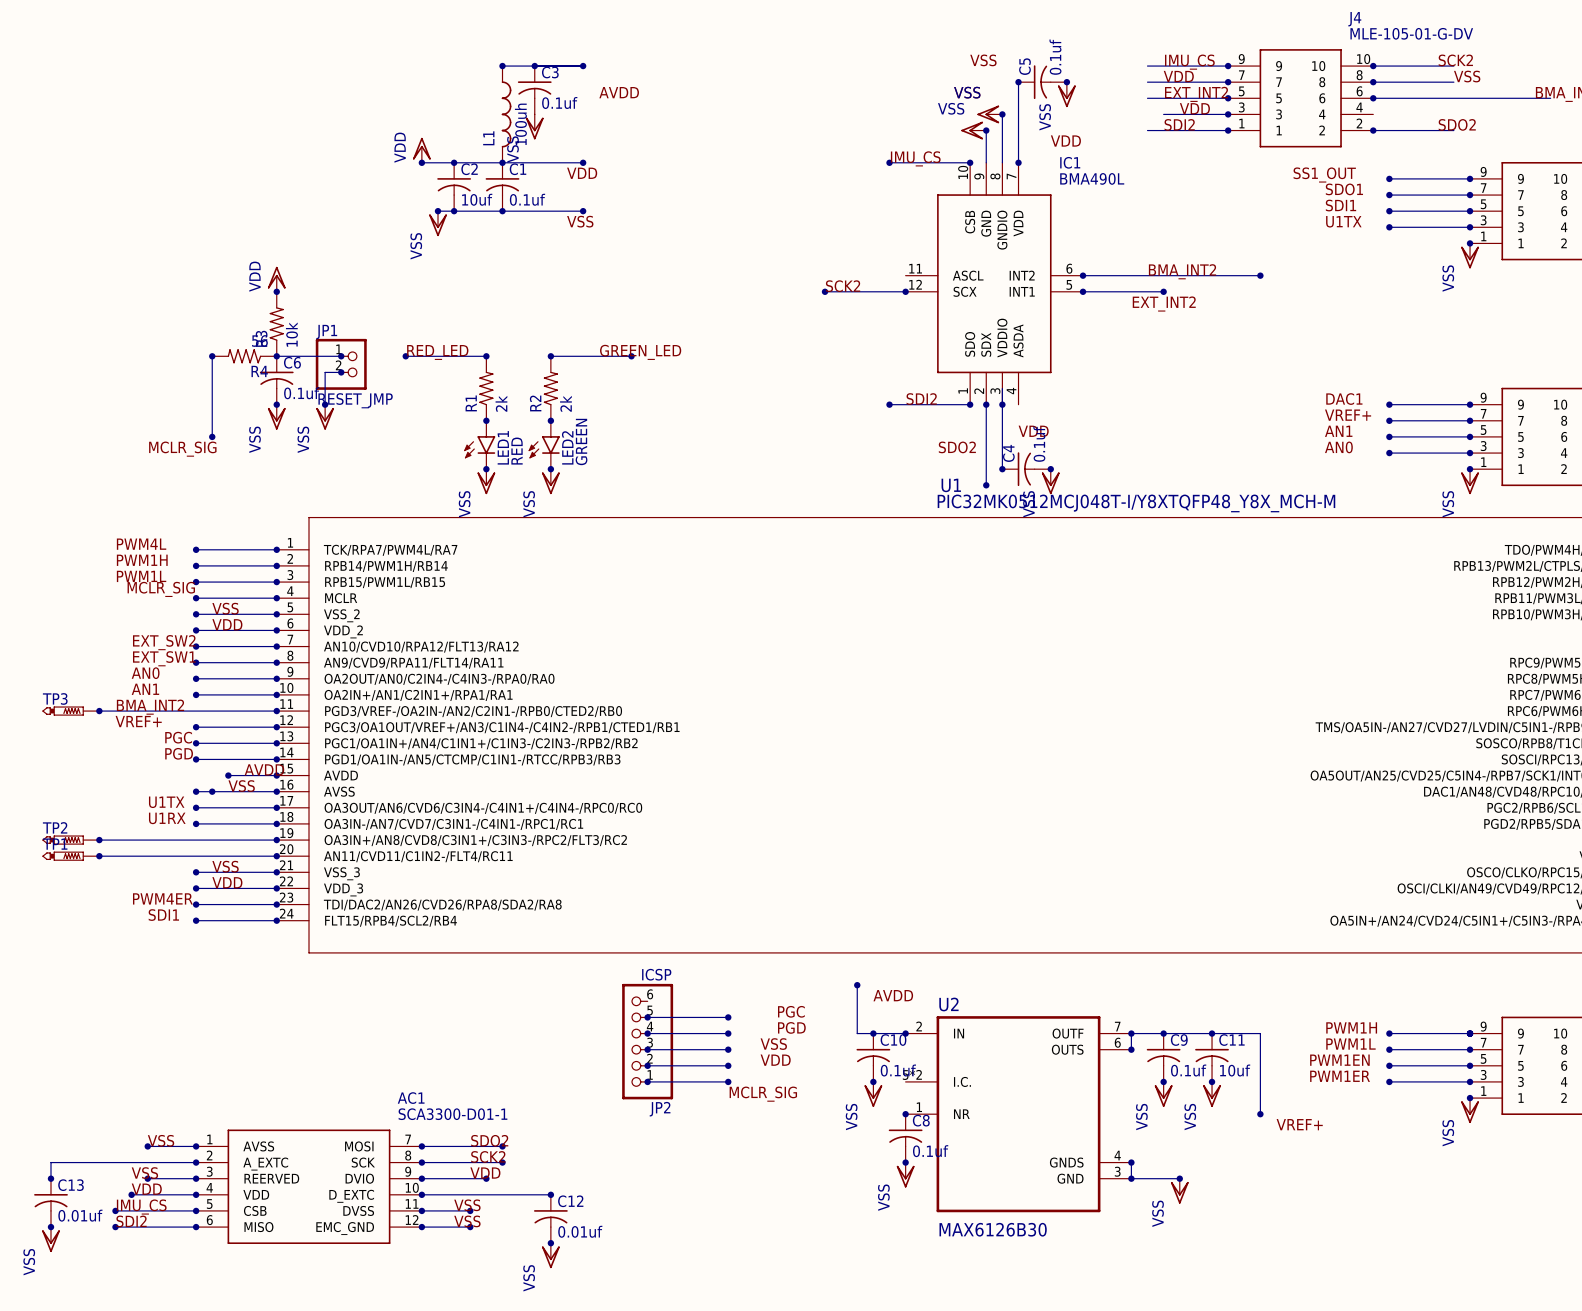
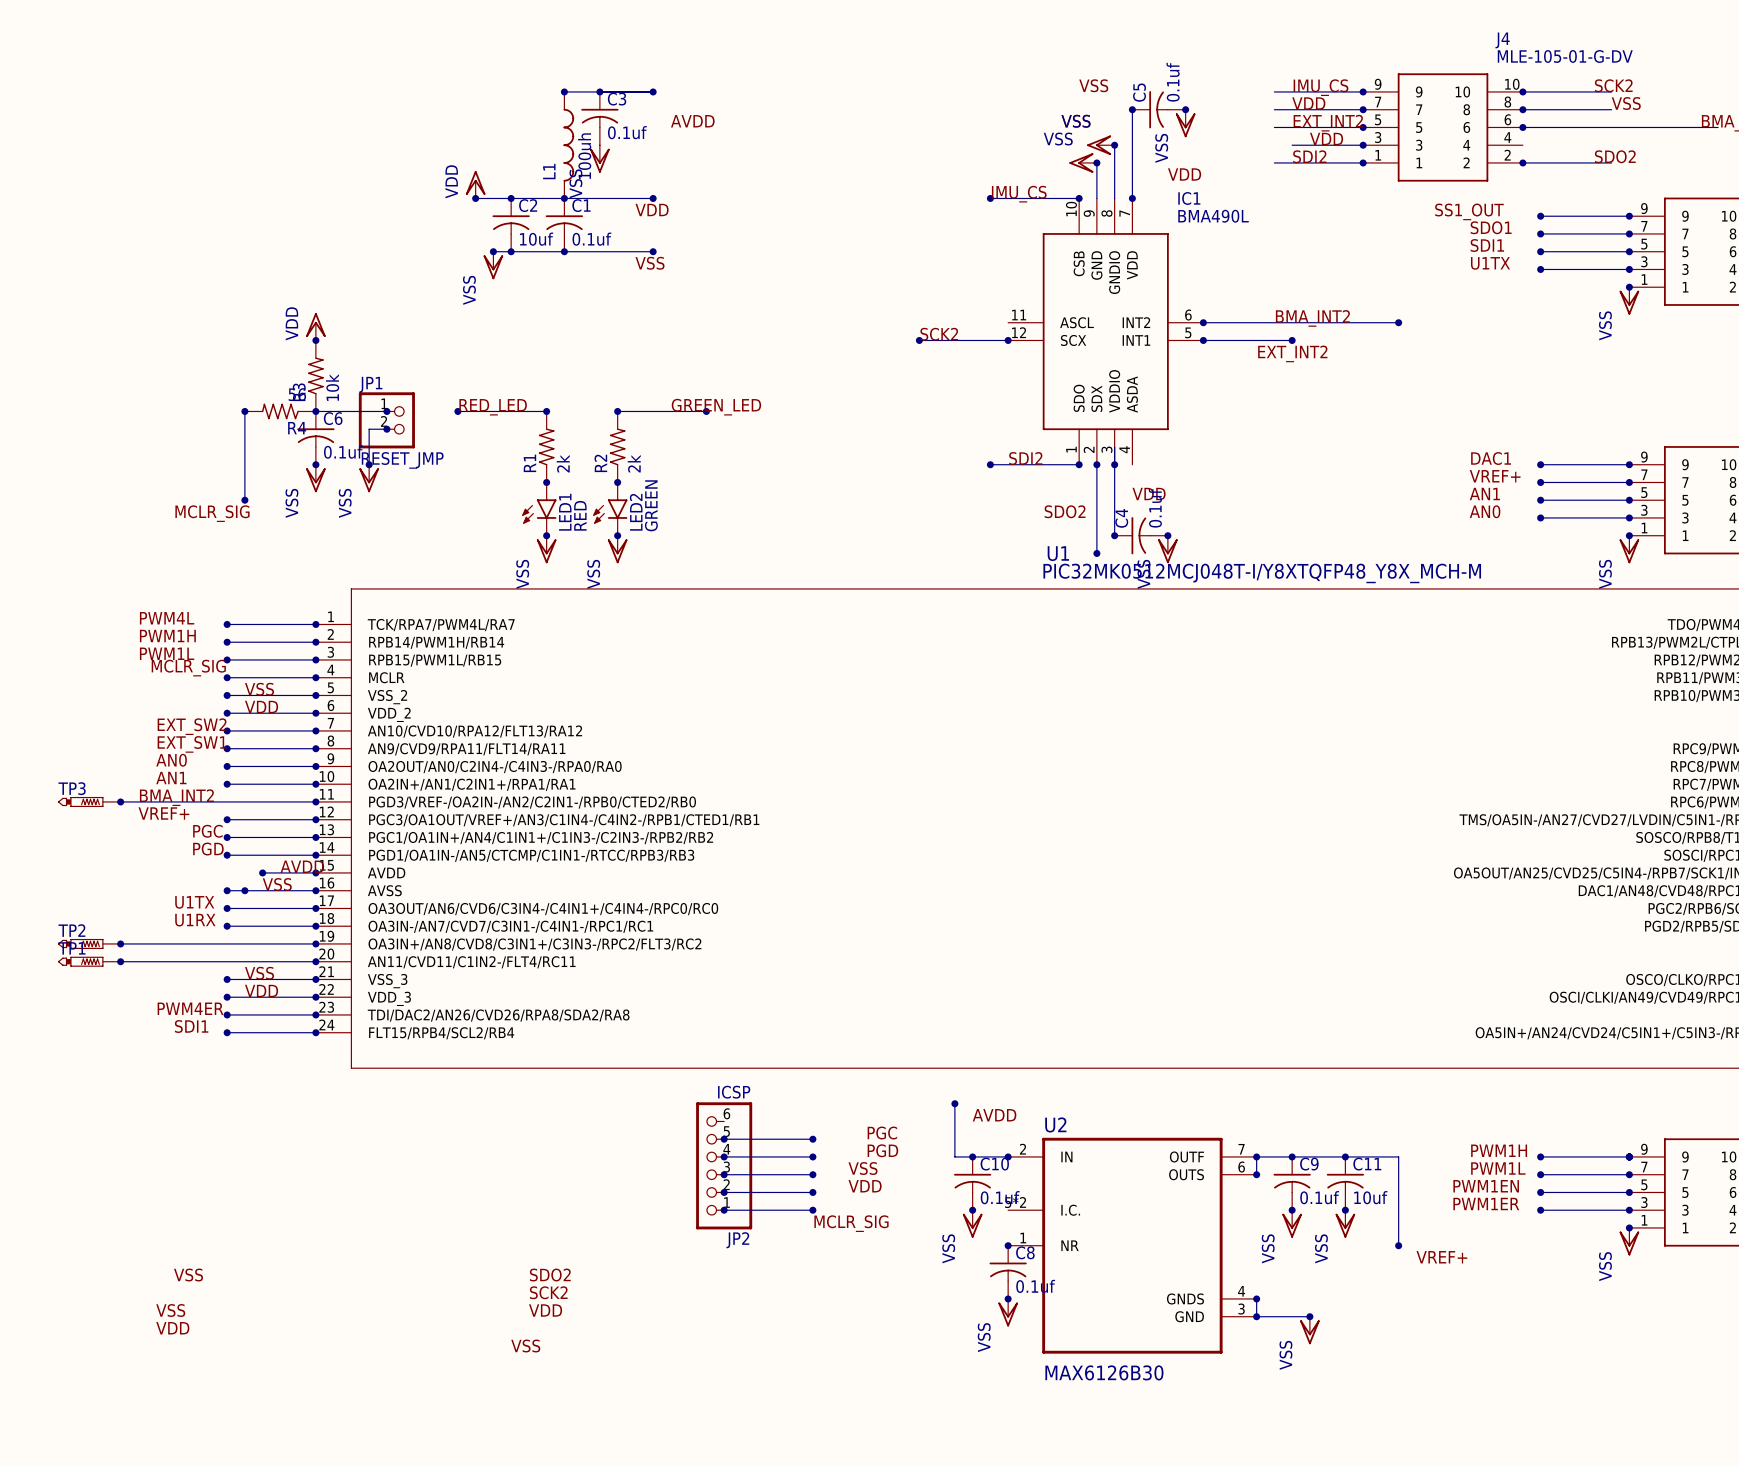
wire: (147, 1146) (196, 1146) -> none
junction: (147, 1146) -> none
junction: (196, 1146) -> none
wire: (421, 1146) (502, 1146) -> none
junction: (421, 1146) -> none
junction: (502, 1146) -> none
wire: (196, 1162) (50, 1162) (50, 1178) -> none
junction: (196, 1162) -> none
wire: (421, 1162) (502, 1162) -> none
junction: (421, 1162) -> none
junction: (502, 1162) -> none
junction: (50, 1178) -> none
wire: (147, 1178) (196, 1178) -> none
junction: (147, 1178) -> none
junction: (196, 1178) -> none
wire: (421, 1178) (486, 1178) -> none
junction: (421, 1178) -> none
junction: (486, 1178) -> none
AC1: SCA3300-D01-1 (309, 1186) -> none
wire: (131, 1194) (196, 1194) -> none
junction: (131, 1194) -> none
junction: (196, 1194) -> none
wire: (421, 1194) (550, 1194) -> none
junction: (421, 1194) -> none
junction: (550, 1194) -> none
C13: 0.01uf (50, 1202) -> none
label: IMU_CS (141, 1207) -> none
wire: (115, 1210) (196, 1210) -> none
junction: (115, 1210) -> none
junction: (196, 1210) -> none
wire: (421, 1210) (470, 1210) -> none
junction: (421, 1210) -> none
junction: (470, 1210) -> none
C12: 0.01uf (550, 1219) -> none
label: SDI2 (131, 1221) -> none
label: VSS (467, 1221) -> none
junction: (50, 1227) -> none
wire: (115, 1227) (196, 1227) -> none
junction: (115, 1227) -> none
junction: (196, 1227) -> none
wire: (421, 1227) (470, 1227) -> none
junction: (421, 1227) -> none
junction: (470, 1227) -> none
power symbol: VSS (50, 1239) -> none
junction: (550, 1243) -> none
power symbol: VSS (550, 1255) -> none

